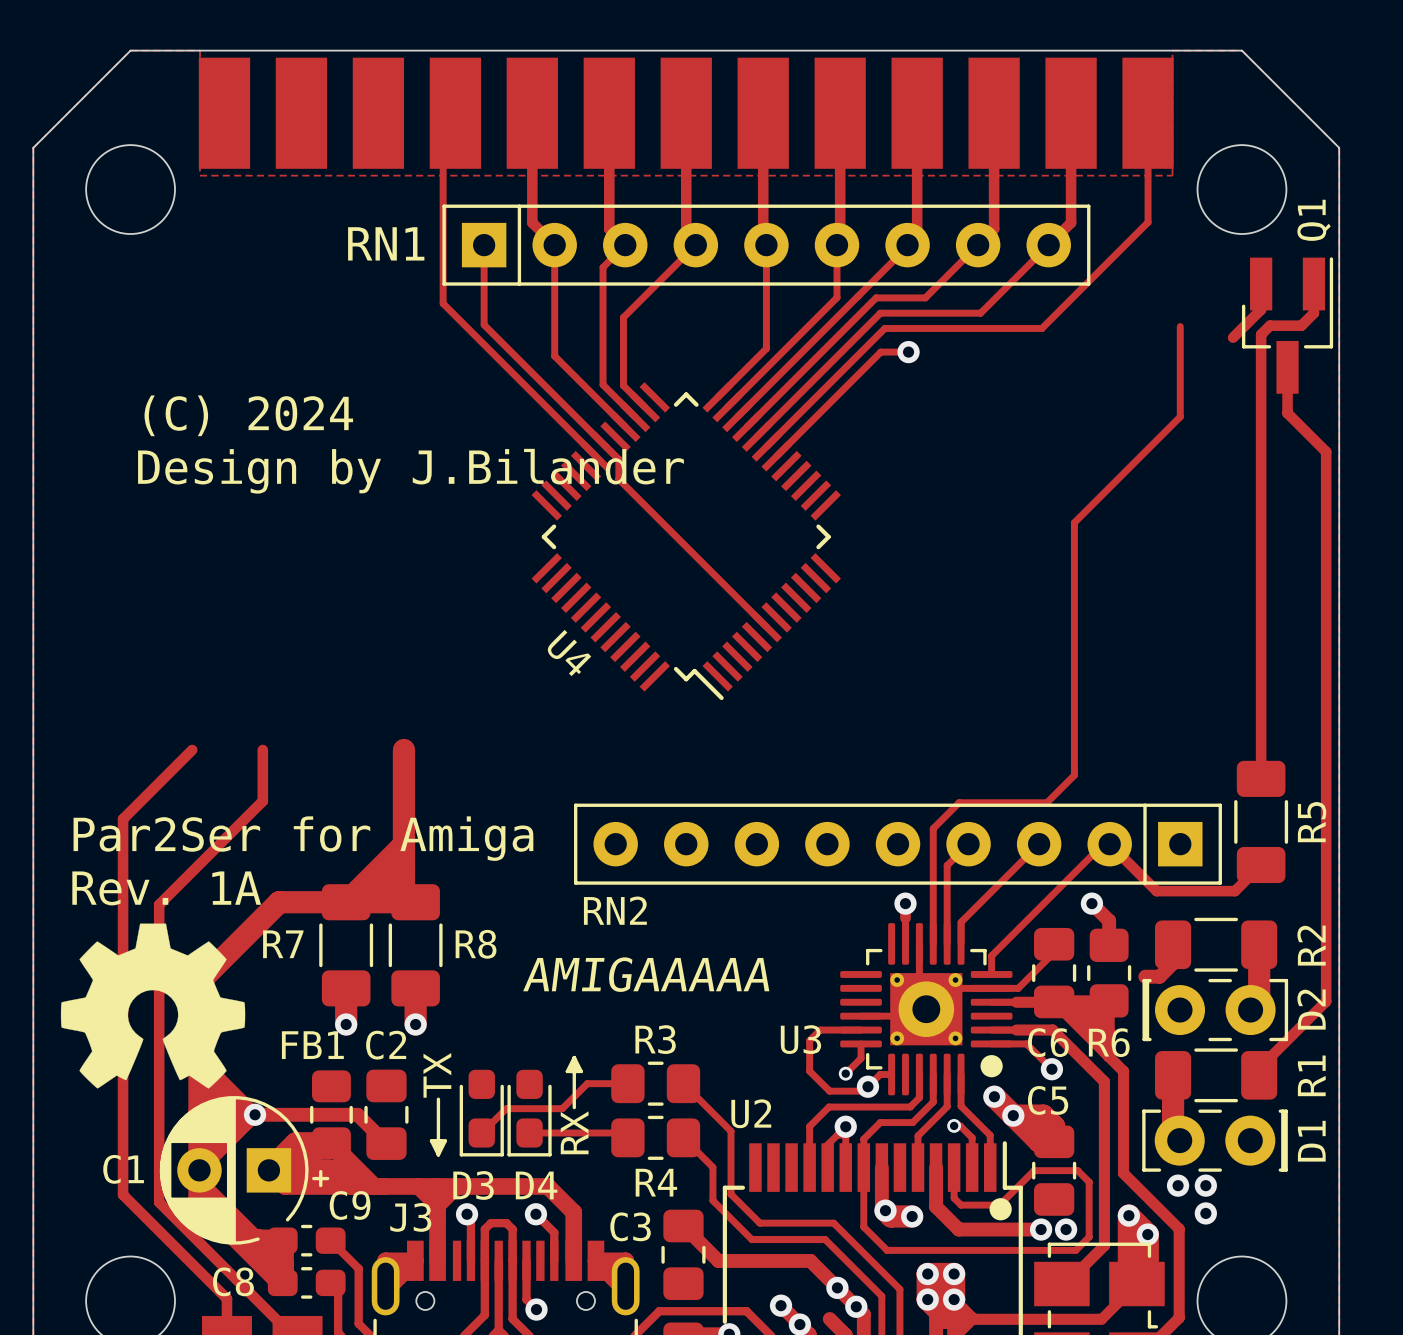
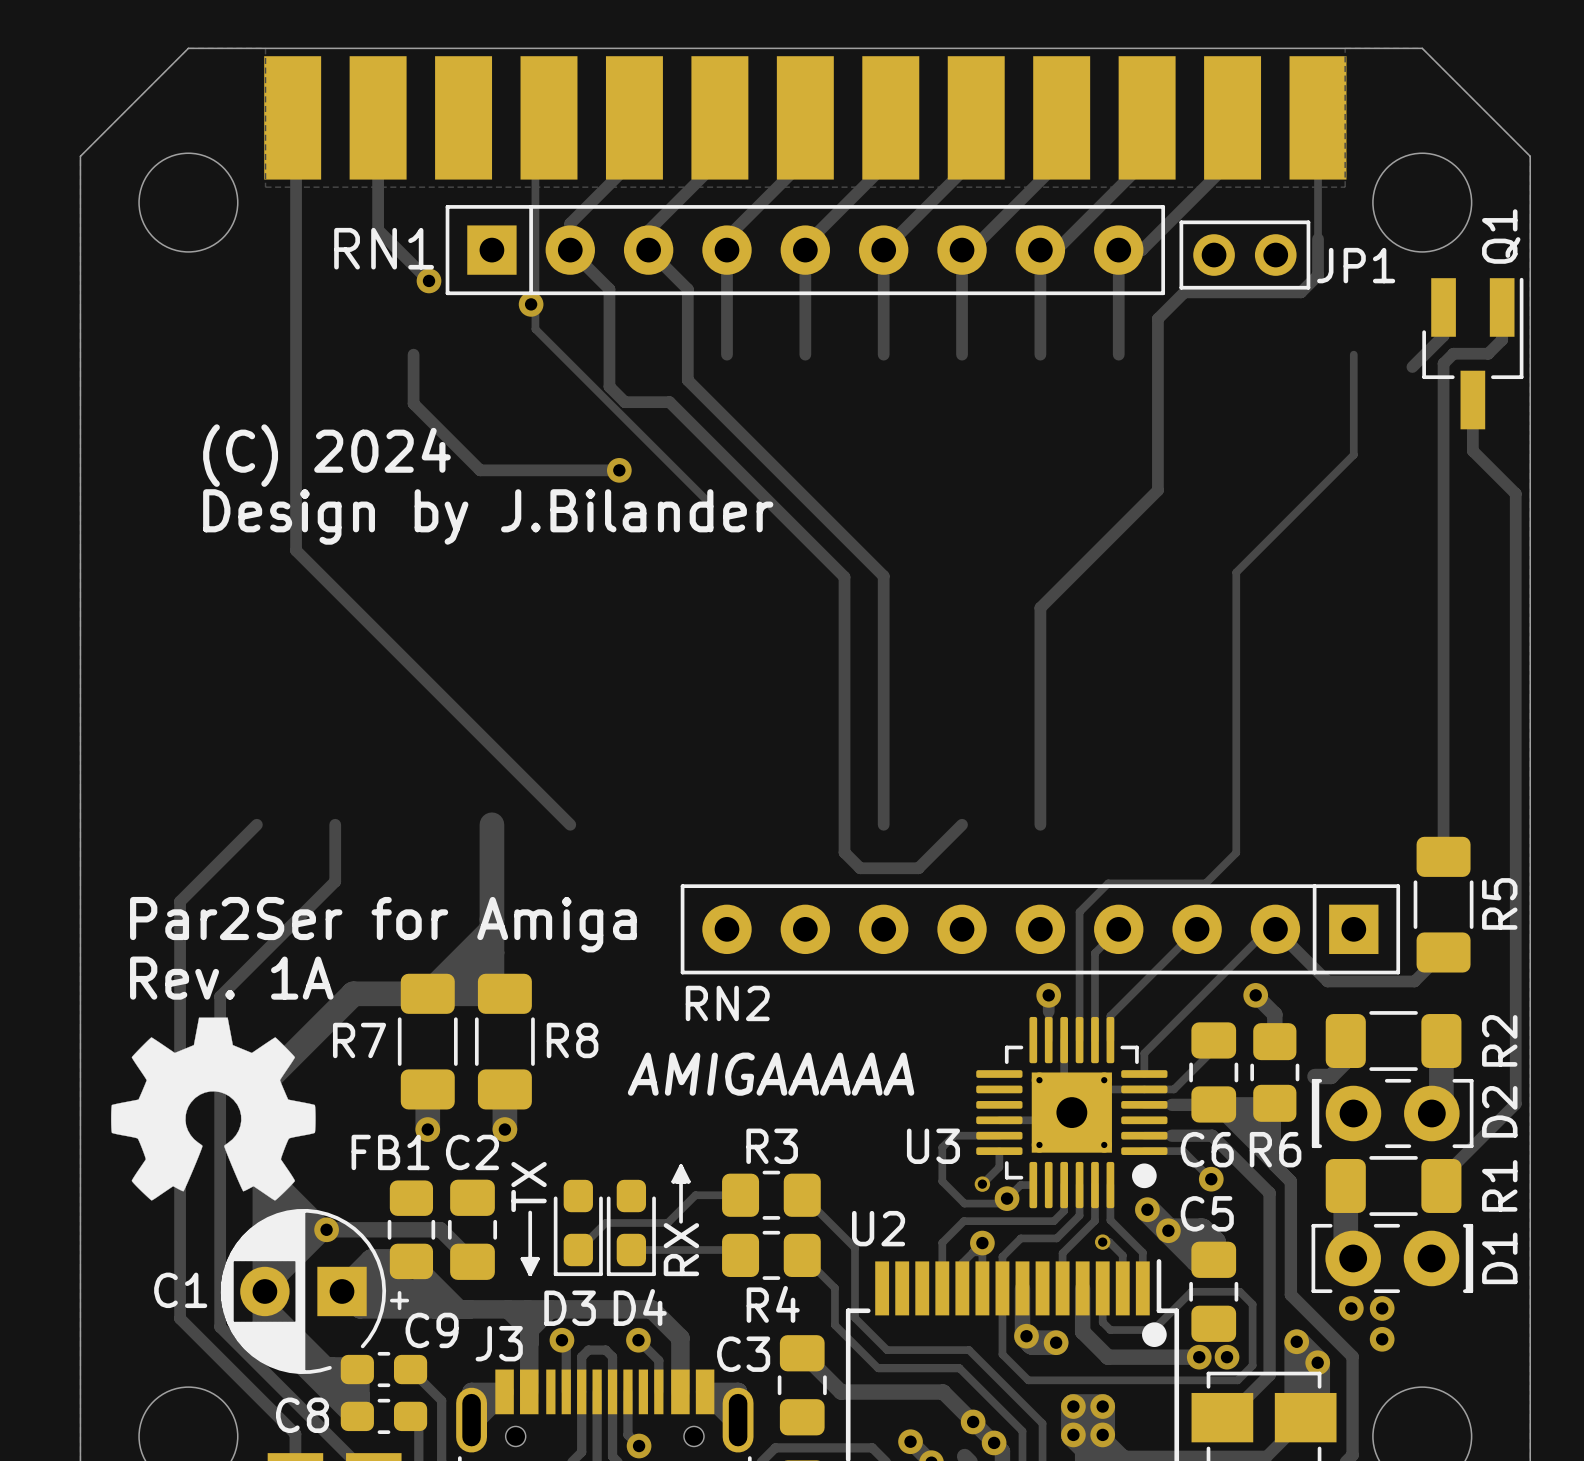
track: none -> (292, 117) (296, 121) (296, 550) (570, 824)
track: none -> (378, 117) (378, 230) (429, 280)
track: (840, 148) (840, 241) (837, 245) (837, 297) (727, 407) -> (976, 157) (883, 250) (883, 354)
track: (532, 150) (532, 222) (554, 245) (554, 356) (625, 426) -> (634, 159) (570, 223) (570, 250) (609, 289) (609, 386) (624, 402) (669, 402) (844, 577) (844, 852) (860, 868) (918, 868) (962, 824)
track: (609, 150) (609, 229) (625, 245) (603, 267) (603, 384) (635, 417) -> (719, 159) (648, 230) (648, 250) (687, 289) (687, 380) (883, 576) (883, 824)
track: (686, 150) (686, 227) -> (890, 159) (805, 244)
track: none -> (805, 159) (726, 237) (726, 354)
track: (763, 150) (763, 241) (766, 245) (766, 348) (717, 397) -> none
track: (917, 150) (917, 235) (737, 417) -> (1061, 159) (970, 250) (962, 250) (962, 354)
track: (994, 150) (994, 229) (925, 297) (876, 297) (747, 426) -> (1147, 159) (1056, 250) (1040, 250) (1040, 354)
track: (1071, 150) (1071, 222) (980, 313) (880, 313) (756, 436) -> (1232, 159) (1141, 250) (1118, 250) (1118, 354)
track: (1148, 222) (1041, 328) (884, 328) (766, 446) -> (1318, 238) (1318, 275) (1301, 292) (1184, 292) (1157, 318) (1157, 490) (1040, 607) (1040, 824)
track: (686, 235) (695, 245) (623, 317) (623, 385) (645, 407) -> (805, 253) (805, 354)
JP1: none -> (1244, 255)
track: (484, 245) (484, 324) (618, 459) (618, 479) (766, 627) -> none
RN1 position: (766, 245) -> (805, 250)
via: none -> (429, 280)
via: none -> (531, 304)
track: none -> (413, 354) (413, 403) (480, 470) (619, 470)
track: (908, 352) (880, 352) (776, 456) -> none
via: (908, 352) -> none
via: none -> (619, 470)
U4: (686, 541) -> none

